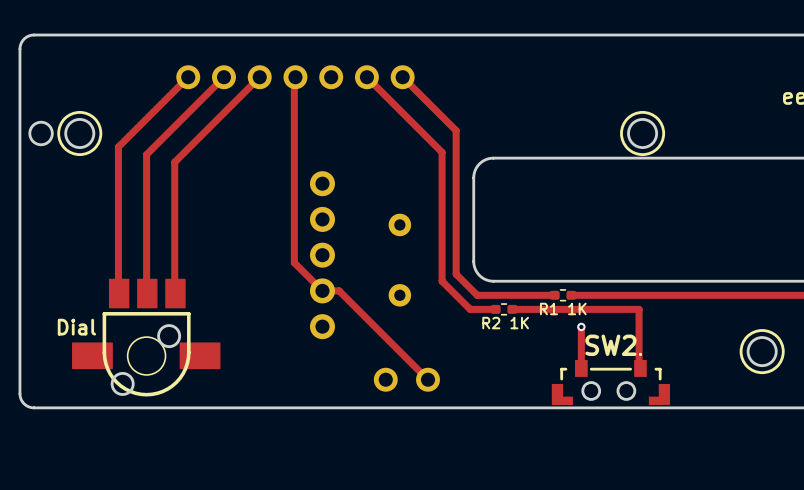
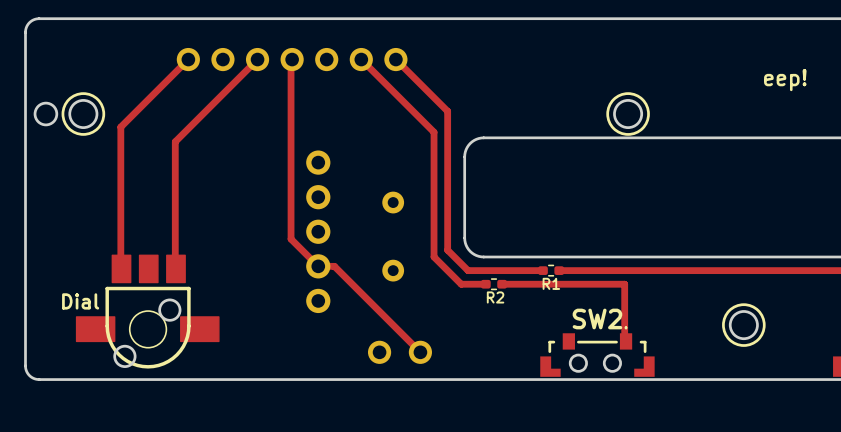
track: (223, 77) (146, 154) (146, 288) -> none
R1 1K name: R1 1K (563, 308) -> R1 (551, 283)
R2 1K name: R2 1K (505, 323) -> R2 (495, 297)
track: (581, 326) (581, 368) -> none
via: (581, 326) -> none

